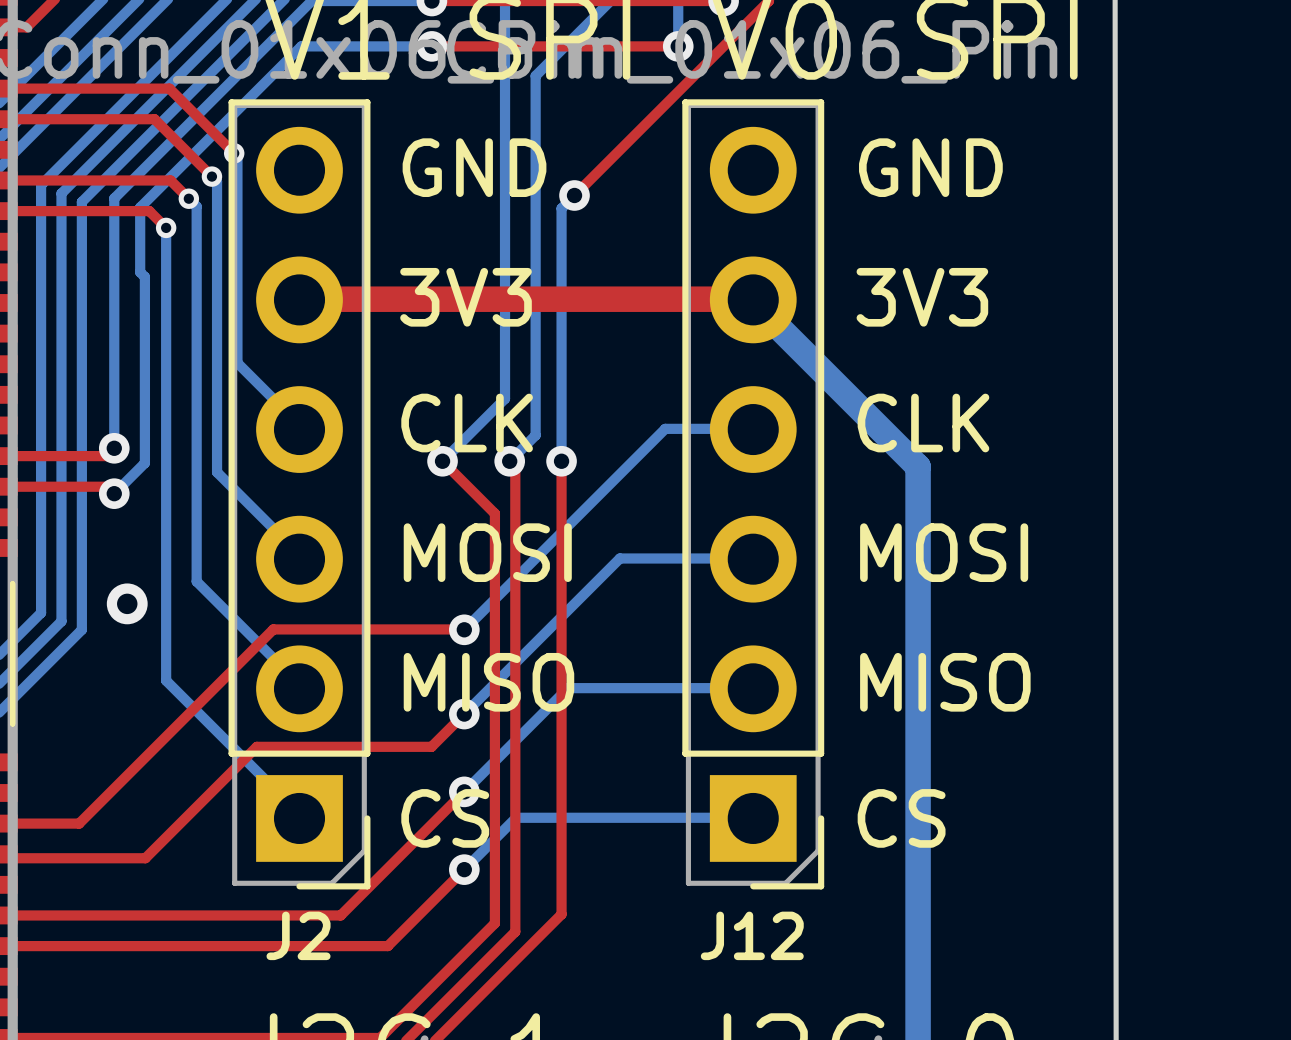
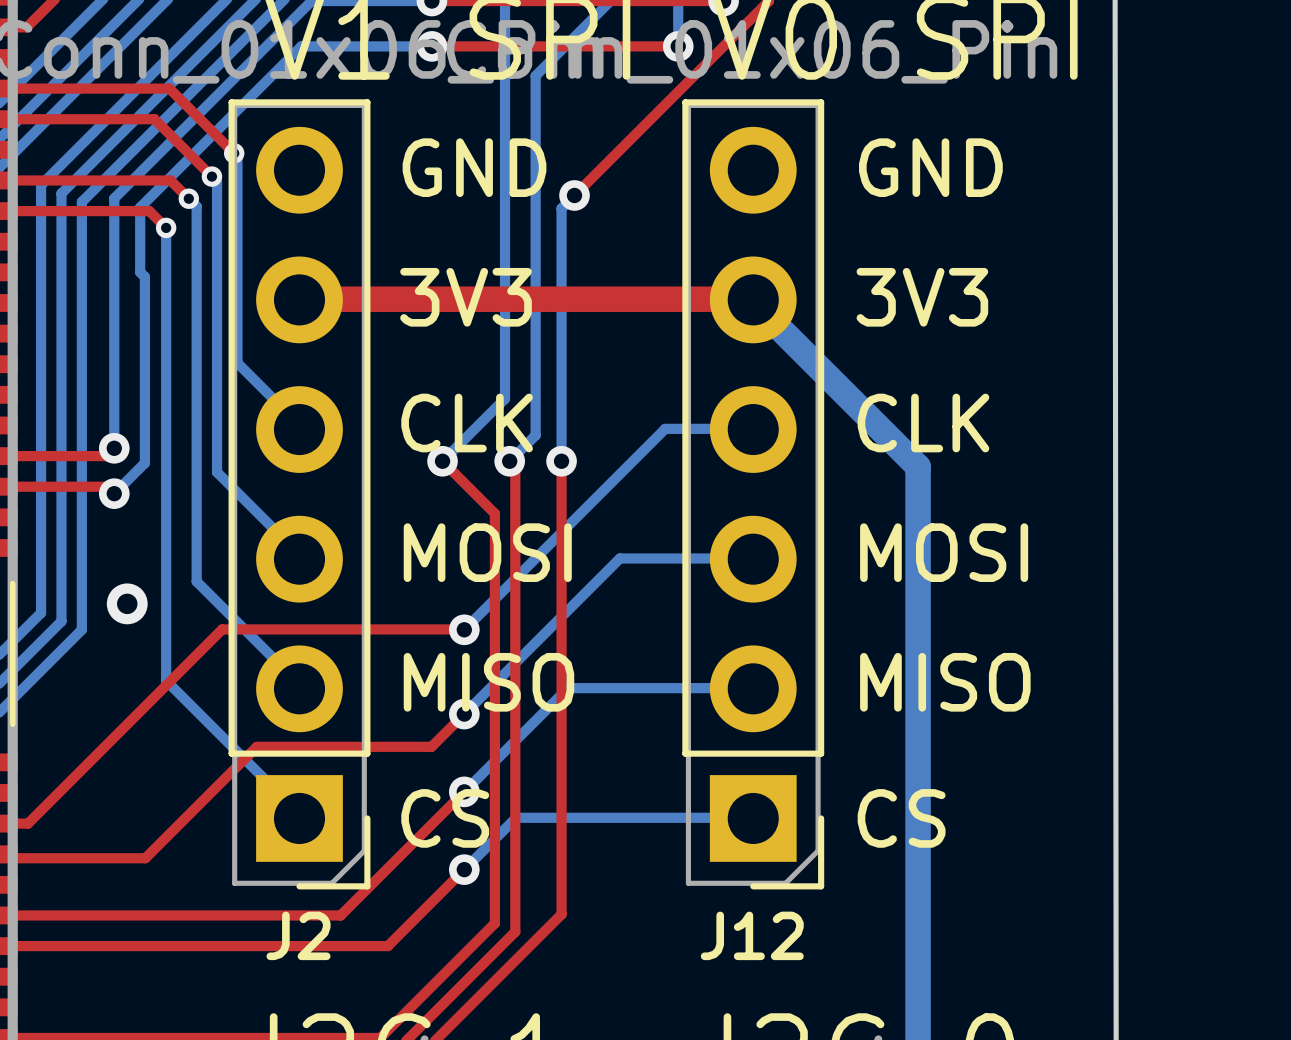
top track: (273, 629) (79, 823) (28, 823) -> (273, 629) (222, 629) (28, 823)

